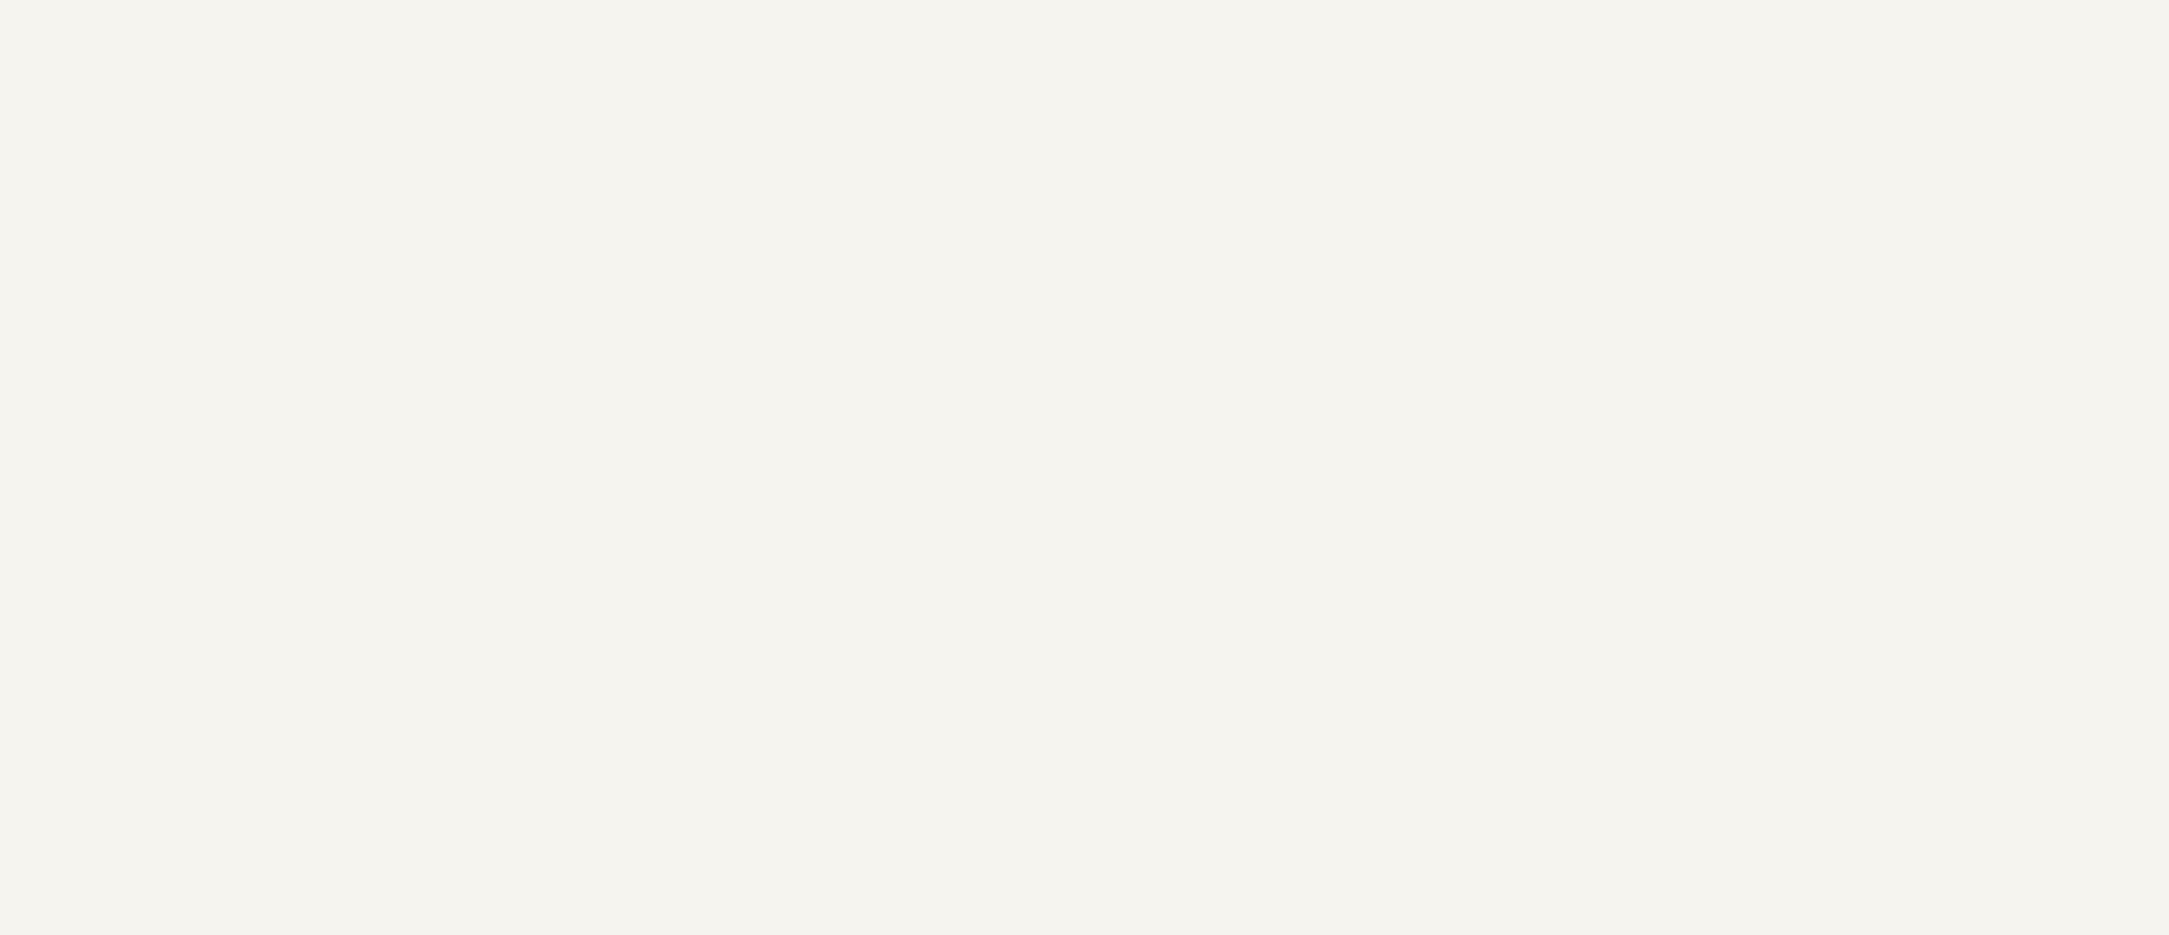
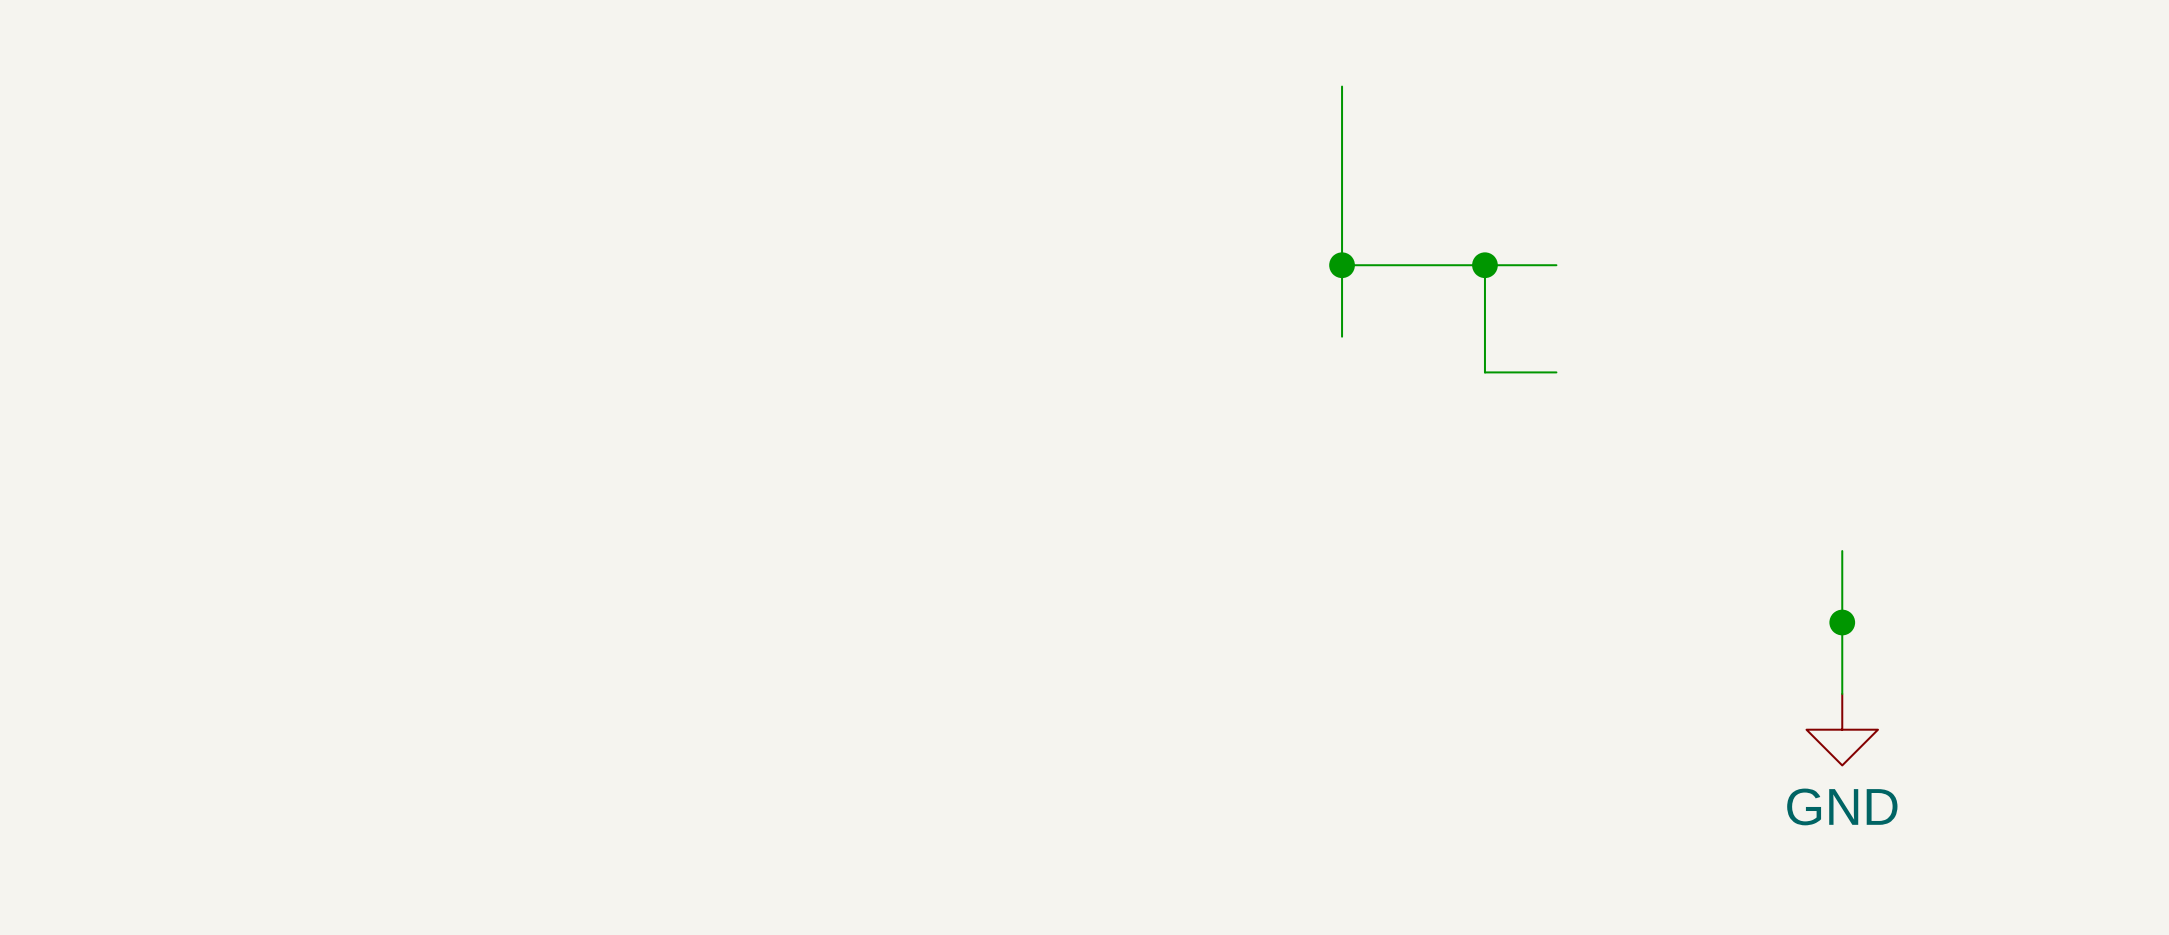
wire: none -> (1342, 86) (1342, 336)
wire: none -> (1342, 265) (1556, 265)
junction: none -> (1342, 265)
wire: none -> (1484, 265) (1484, 372) (1556, 372)
junction: none -> (1484, 265)
wire: none -> (1842, 551) (1842, 693)
junction: none -> (1842, 622)
power symbol: none -> GND (1842, 729)

